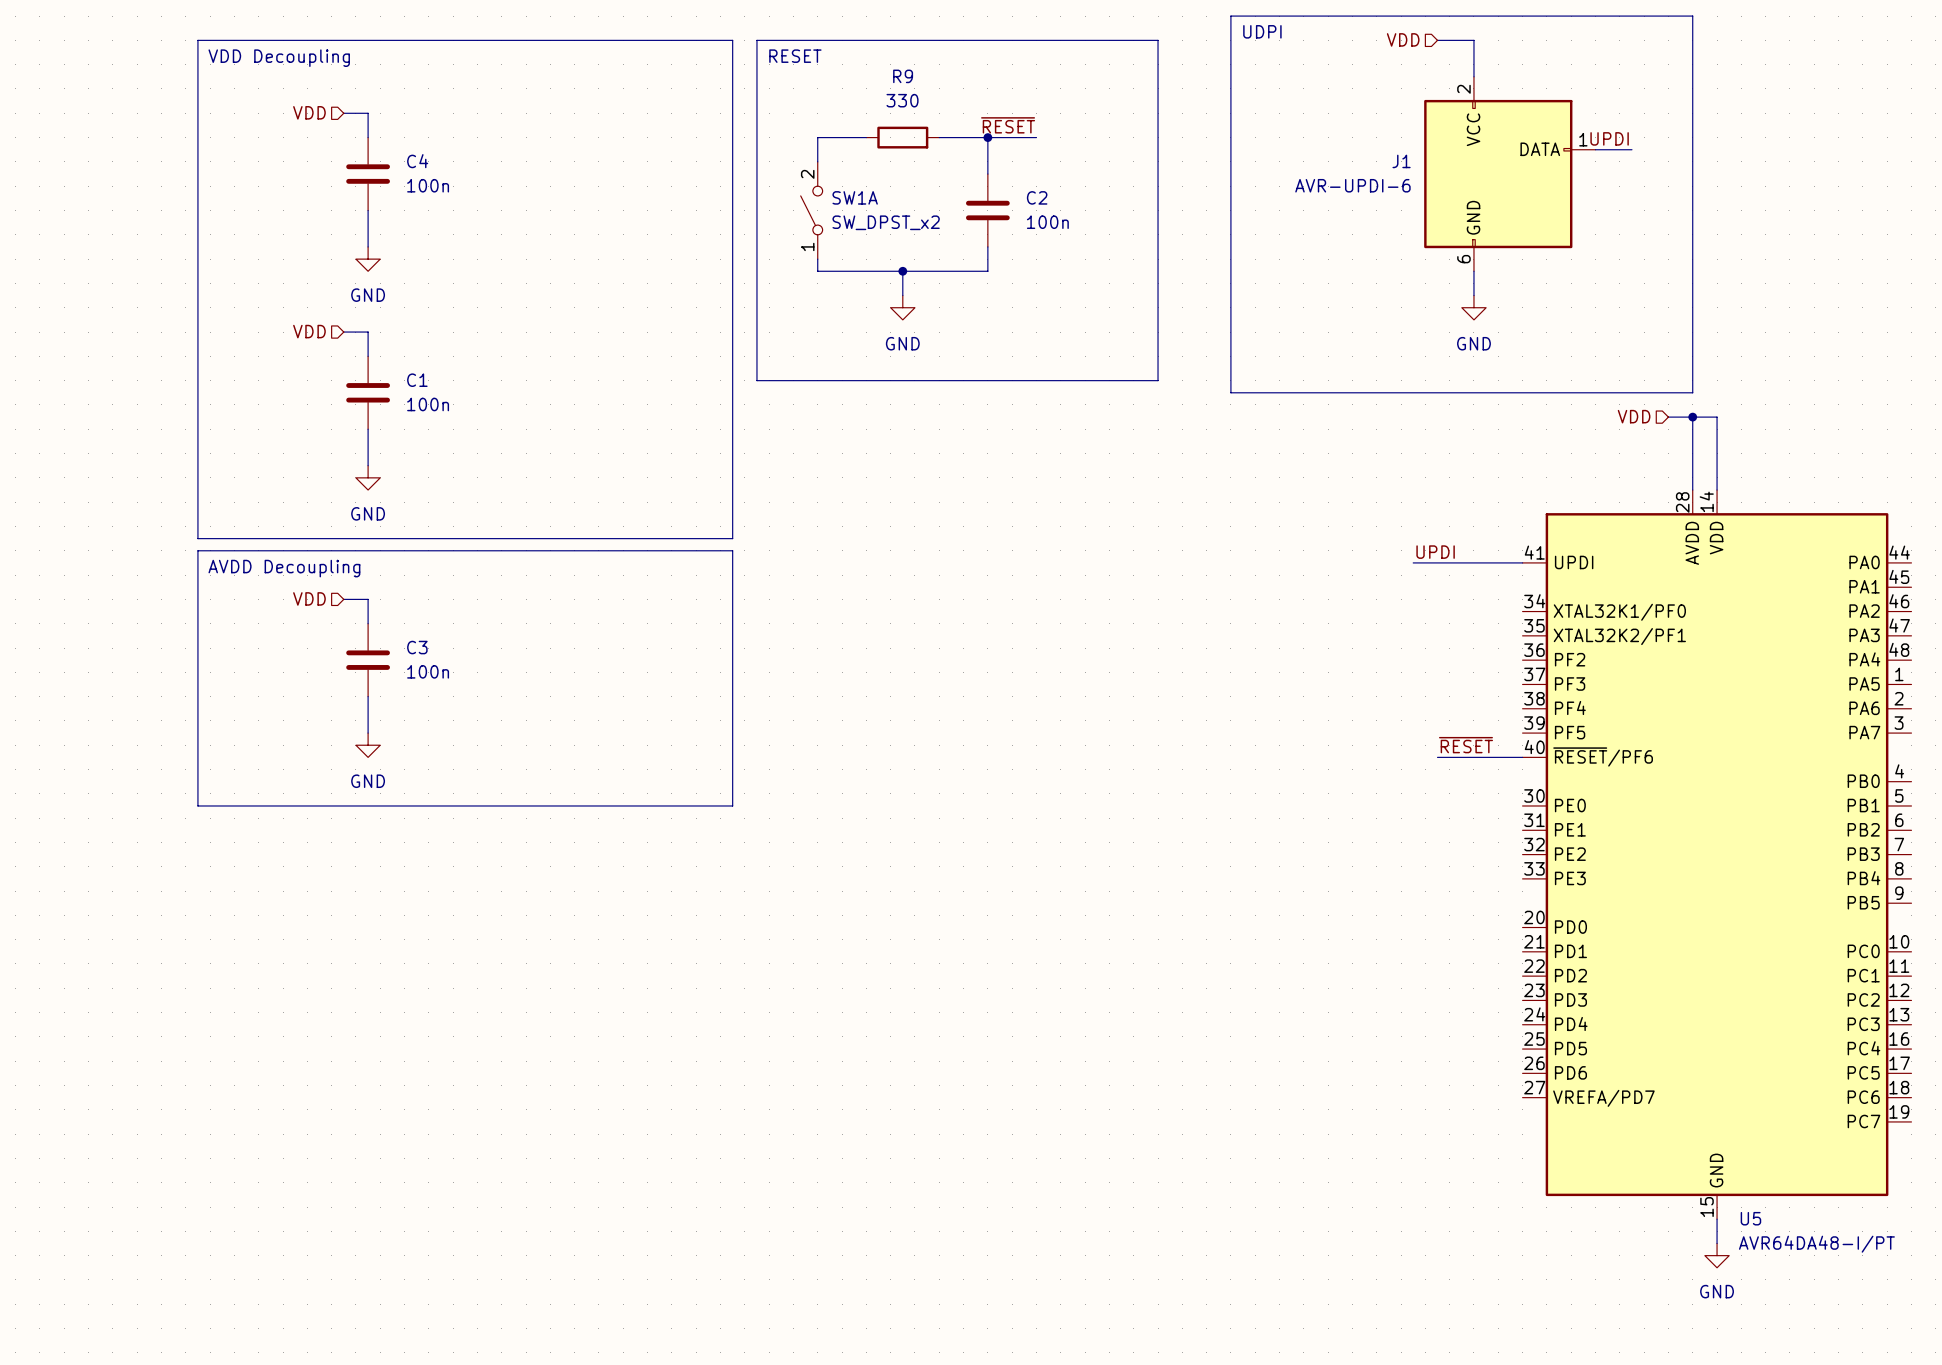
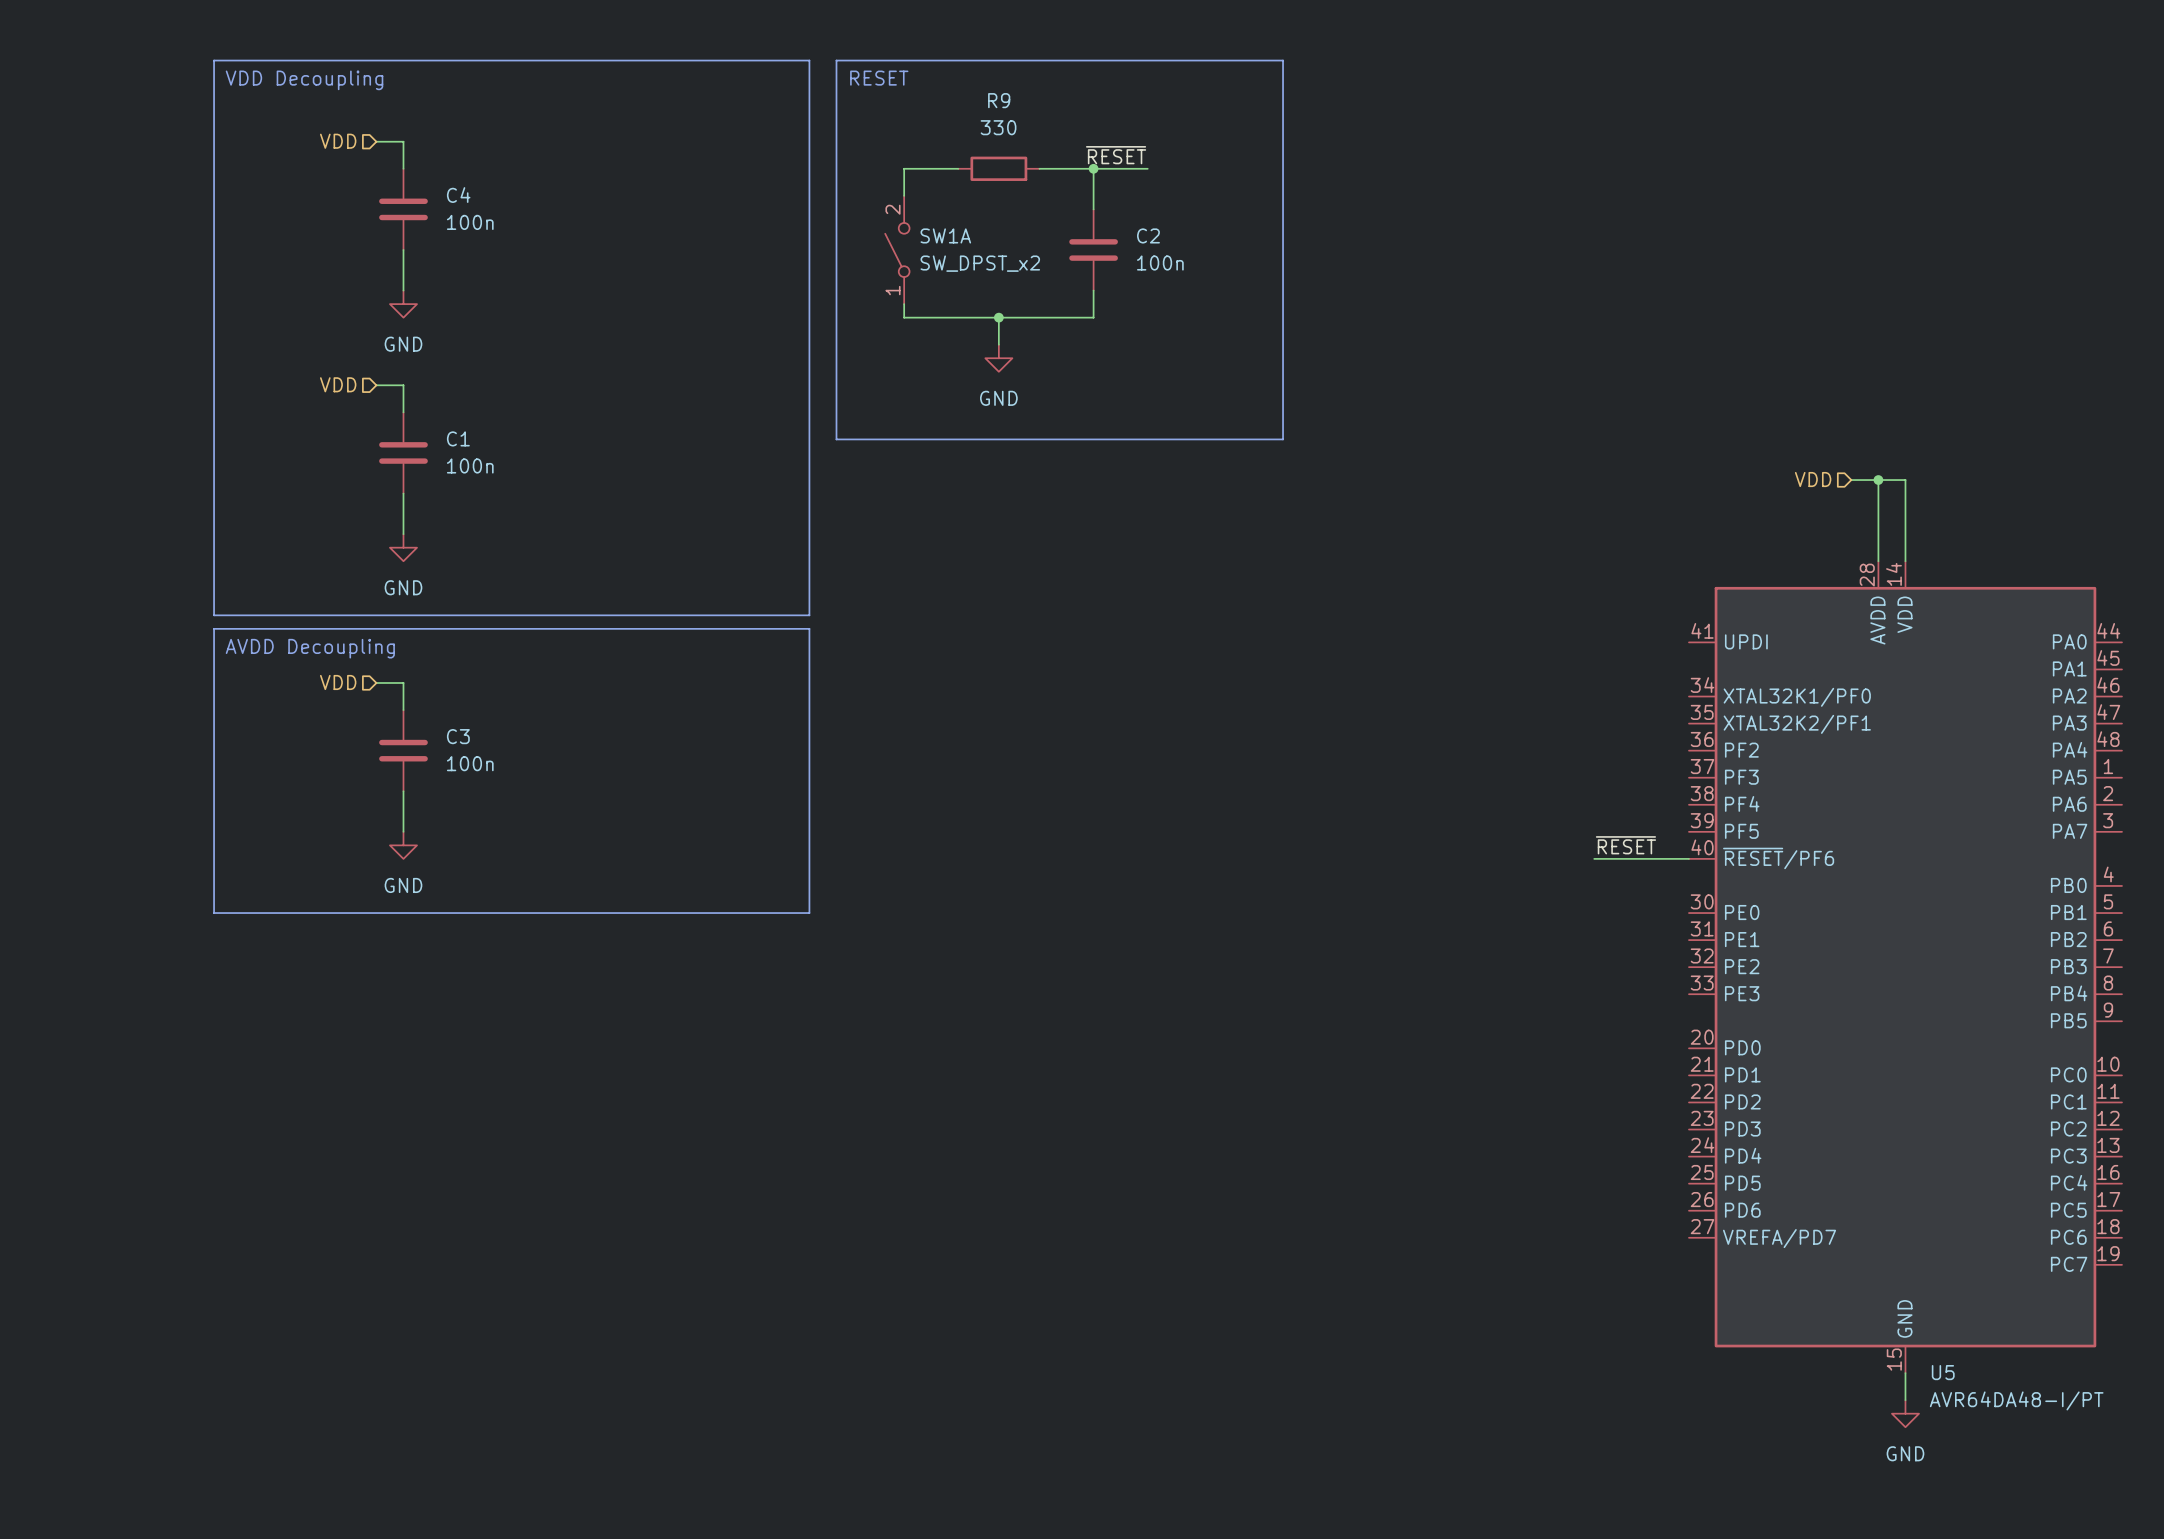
line: (1230, 16) (1692, 16) (1692, 392) (1230, 392) (1230, 16) -> none
text: UDPI (1262, 31) -> none
hierarchical label: VDD (1403, 39) -> none
wire: (1437, 40) (1473, 40) (1473, 76) -> none
label: UPDI (1609, 138) -> none
wire: (1595, 149) (1631, 149) -> none
J1: AVR-UPDI-6 (1509, 174) -> none
wire: (1473, 271) (1473, 295) -> none
power symbol: GND (1473, 307) -> none
label: UPDI (1435, 552) -> none
wire: (1413, 562) (1522, 562) -> none

